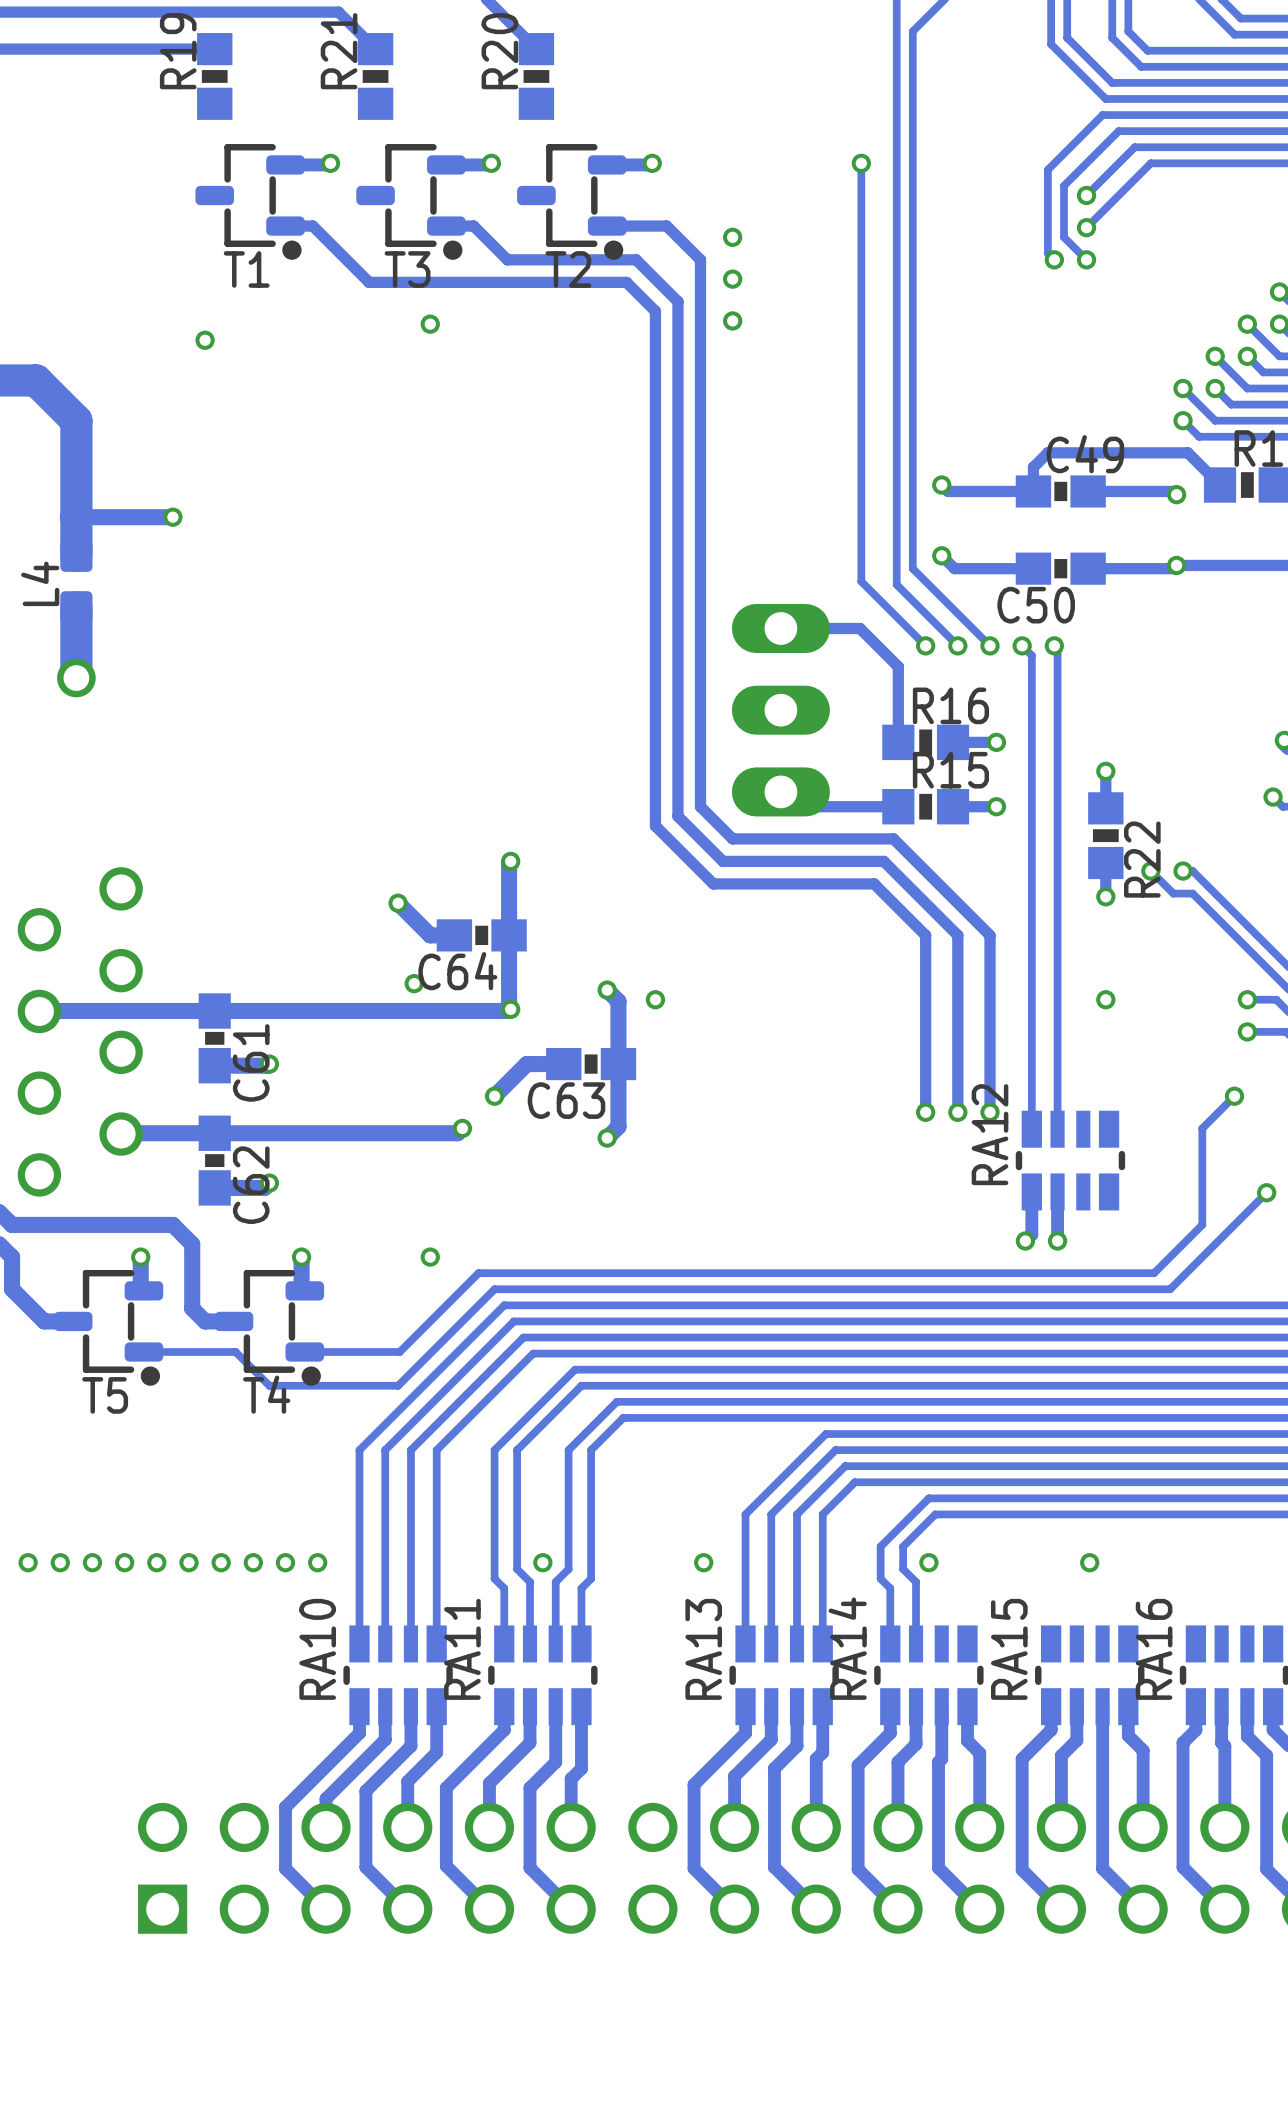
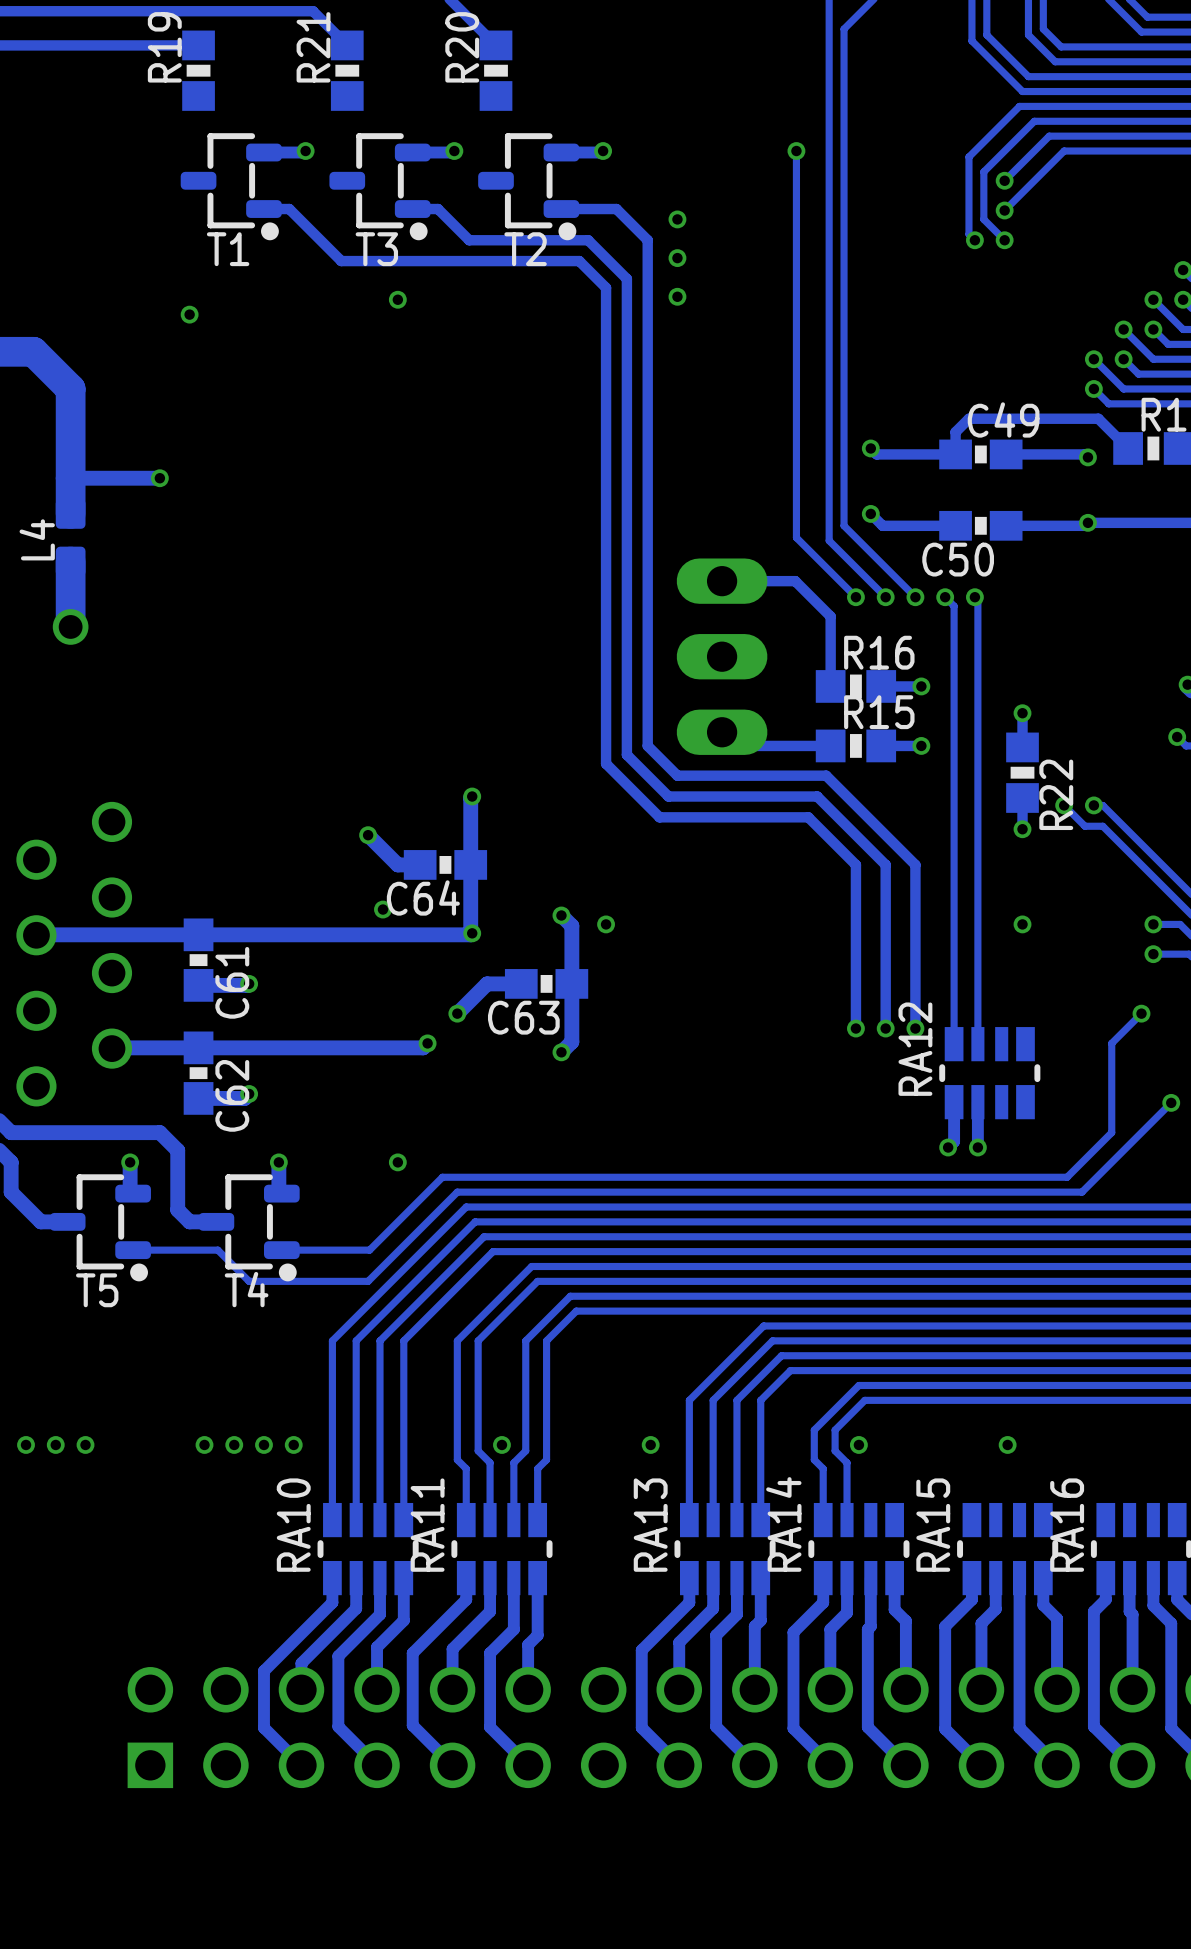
via: (124, 1562) -> none
via: (156, 1562) -> none
via: (188, 1562) -> none

